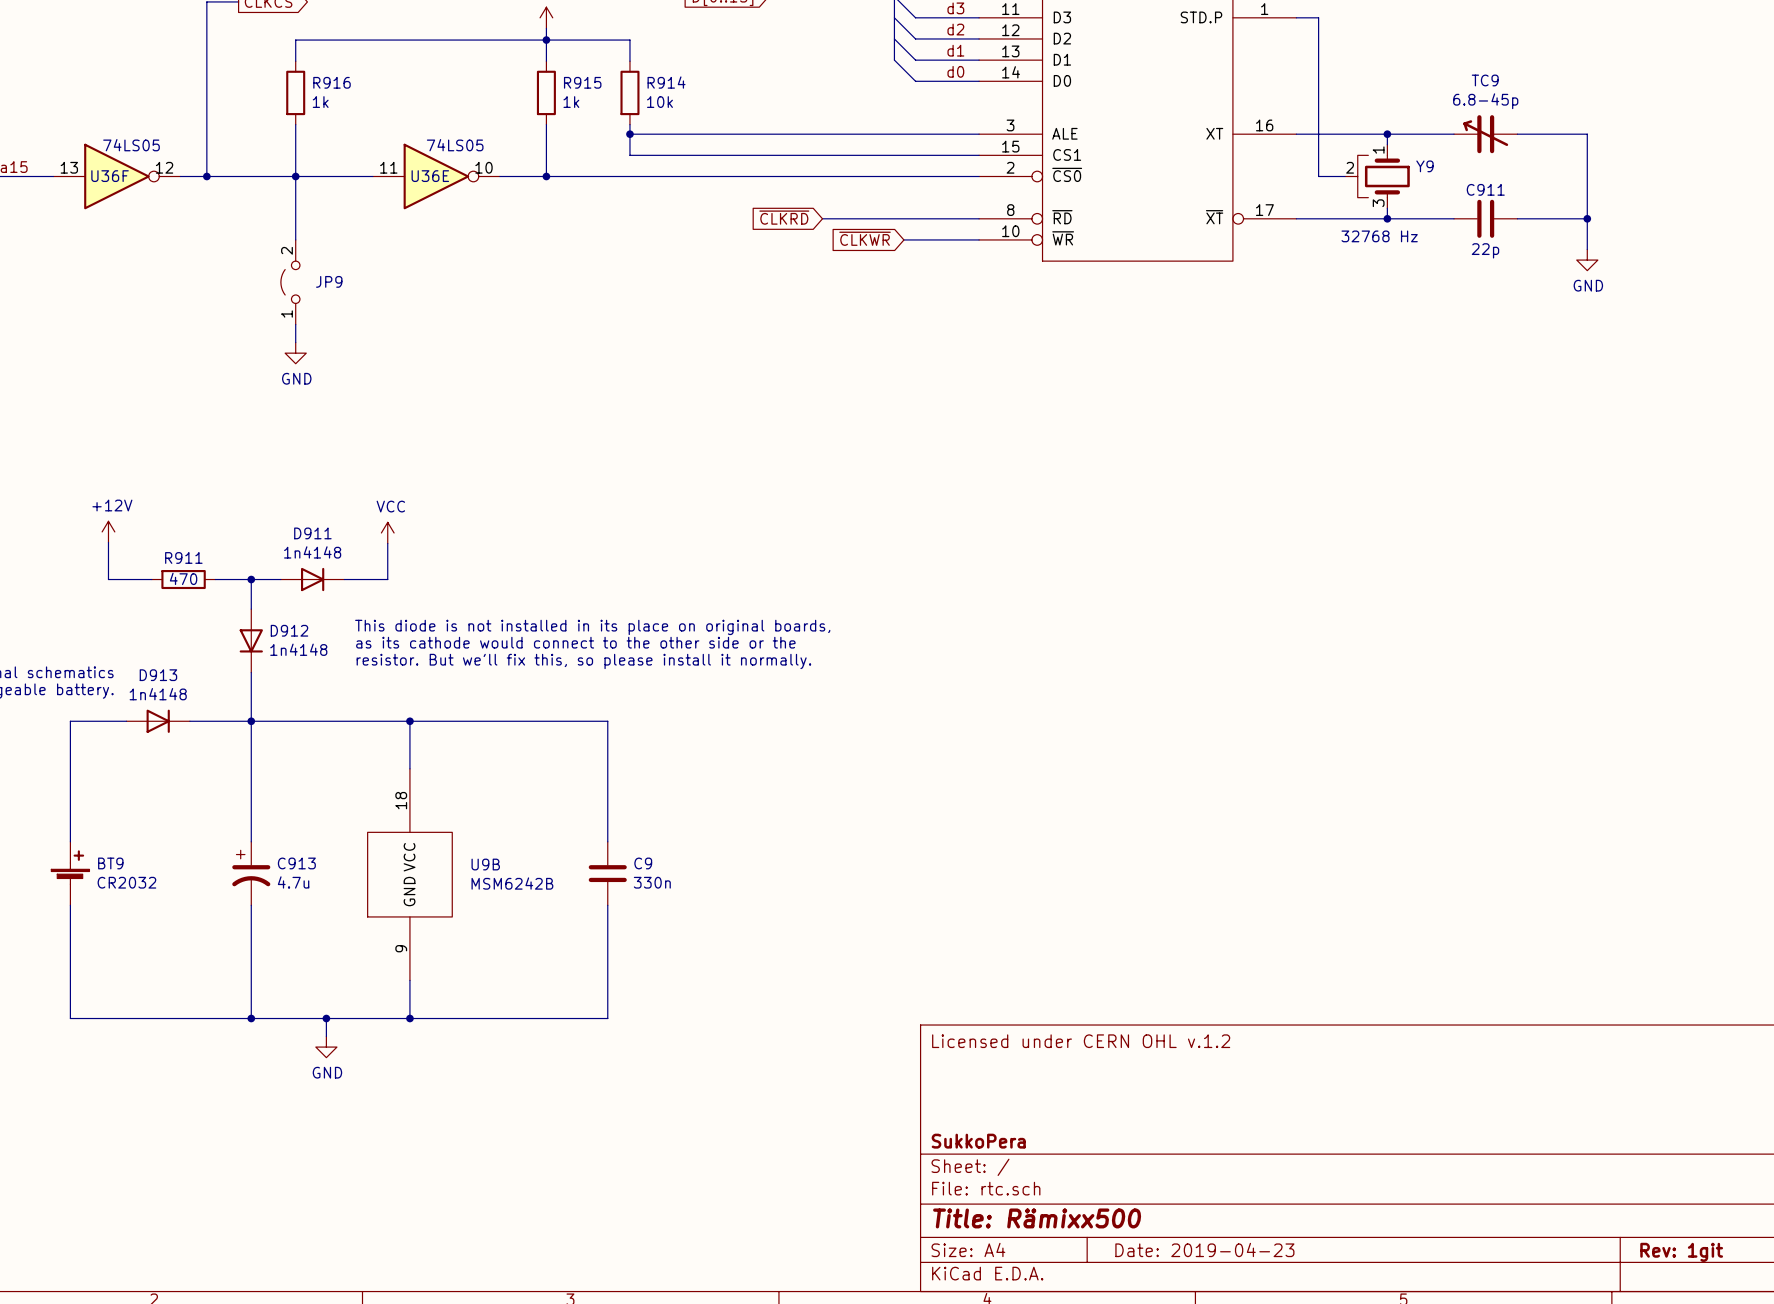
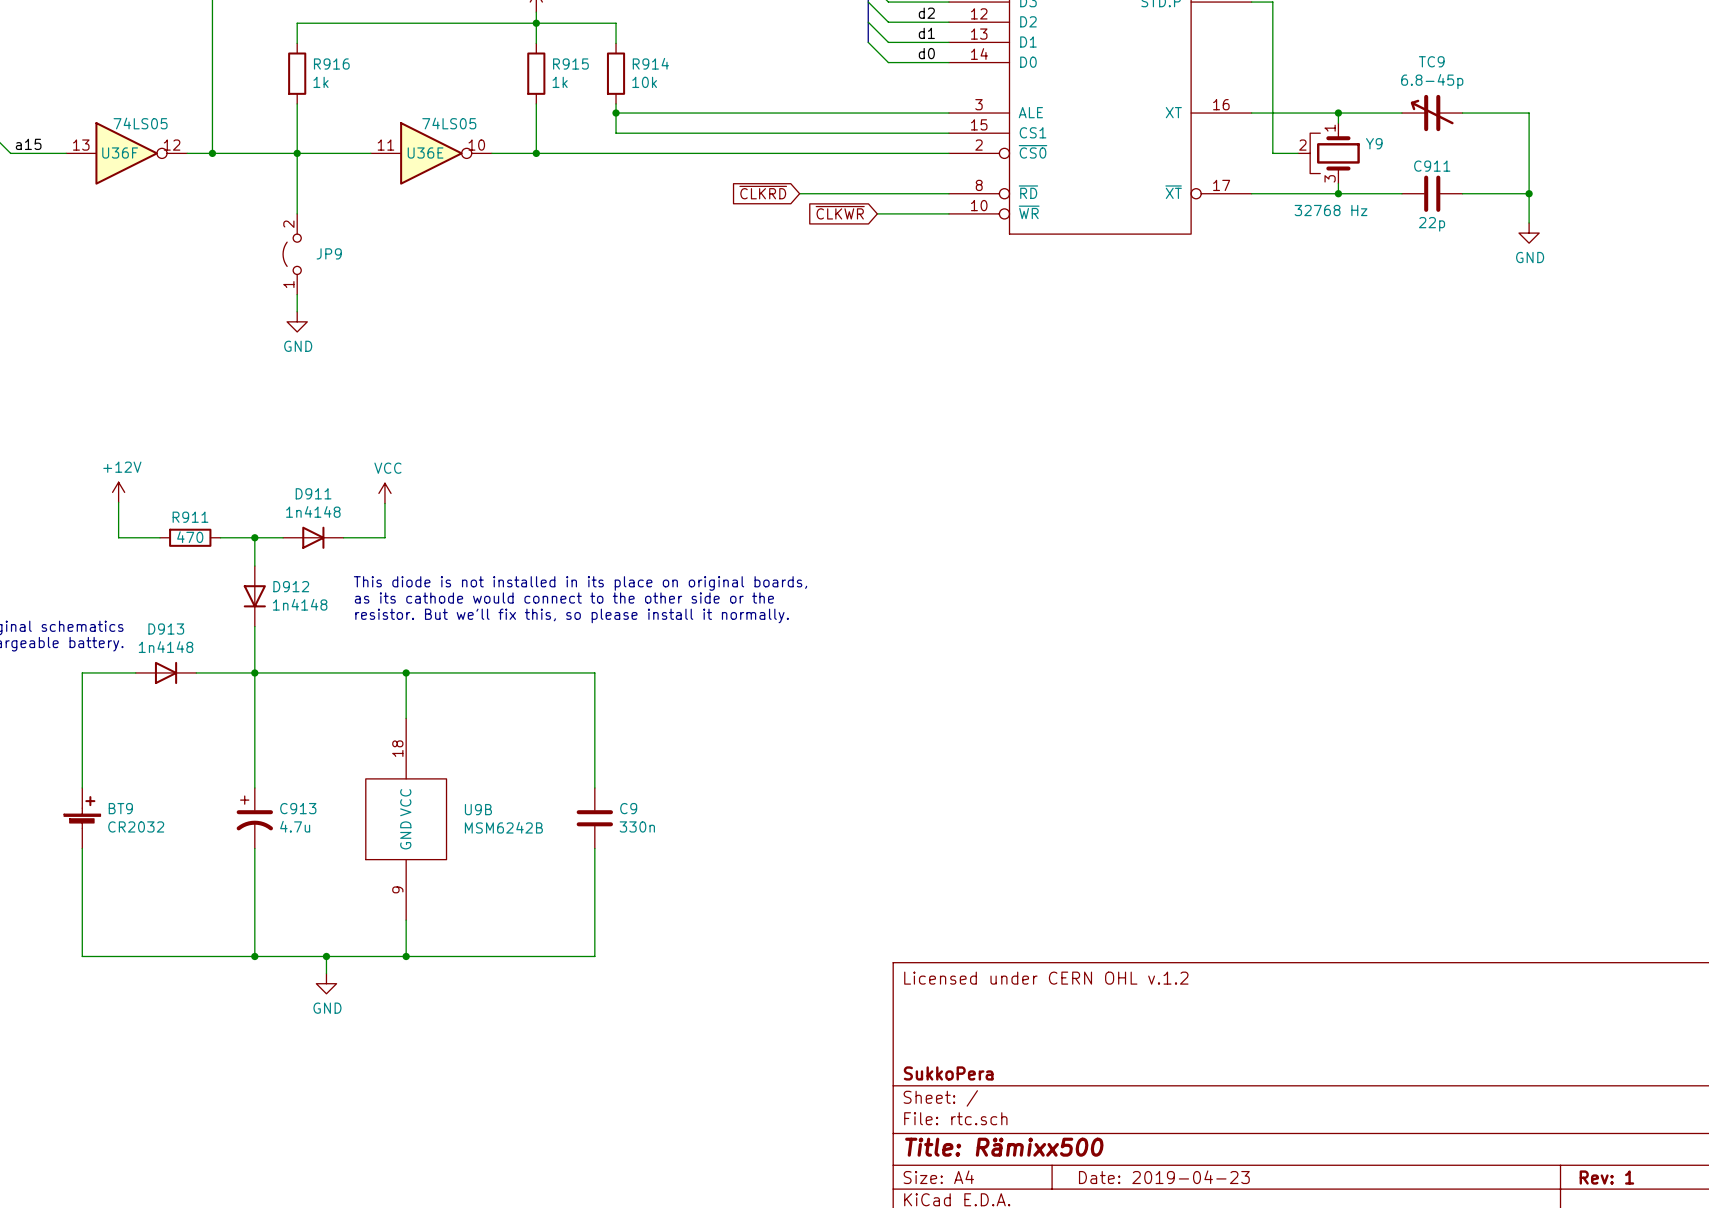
title block: Rev: 1git (1681, 1252) -> Rev: 1 (1606, 1177)

